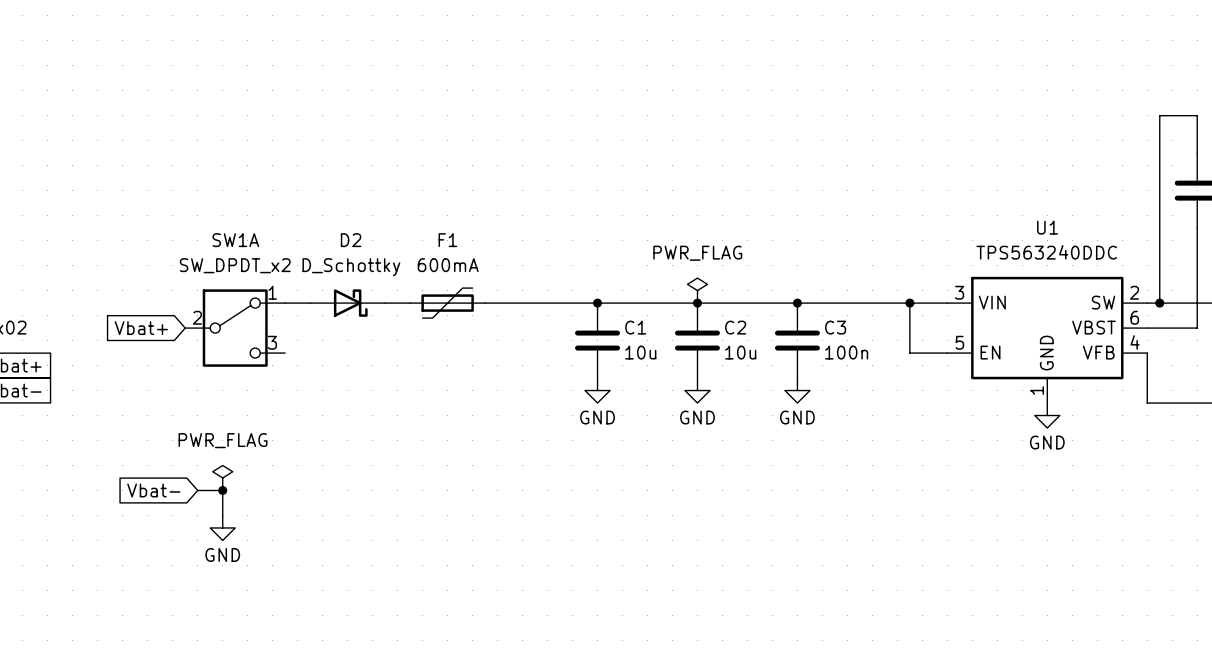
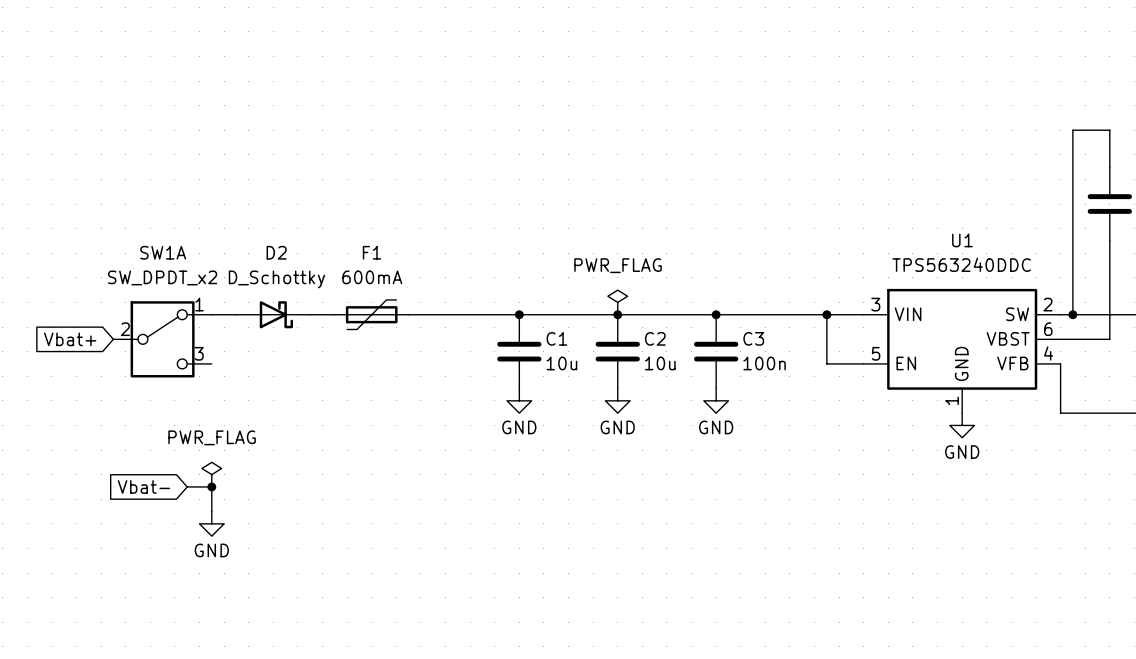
power symbol position: PWR_FLAG (222, 477) -> PWR_FLAG (211, 474)
junction: none -> (211, 486)
global label position: Vbat- (153, 490) -> Vbat- (143, 486)
wire: (197, 490) (222, 490) (222, 515) -> (187, 486) (211, 486) (211, 511)
junction: (222, 490) -> none
power symbol position: GND (222, 527) -> GND (211, 523)

